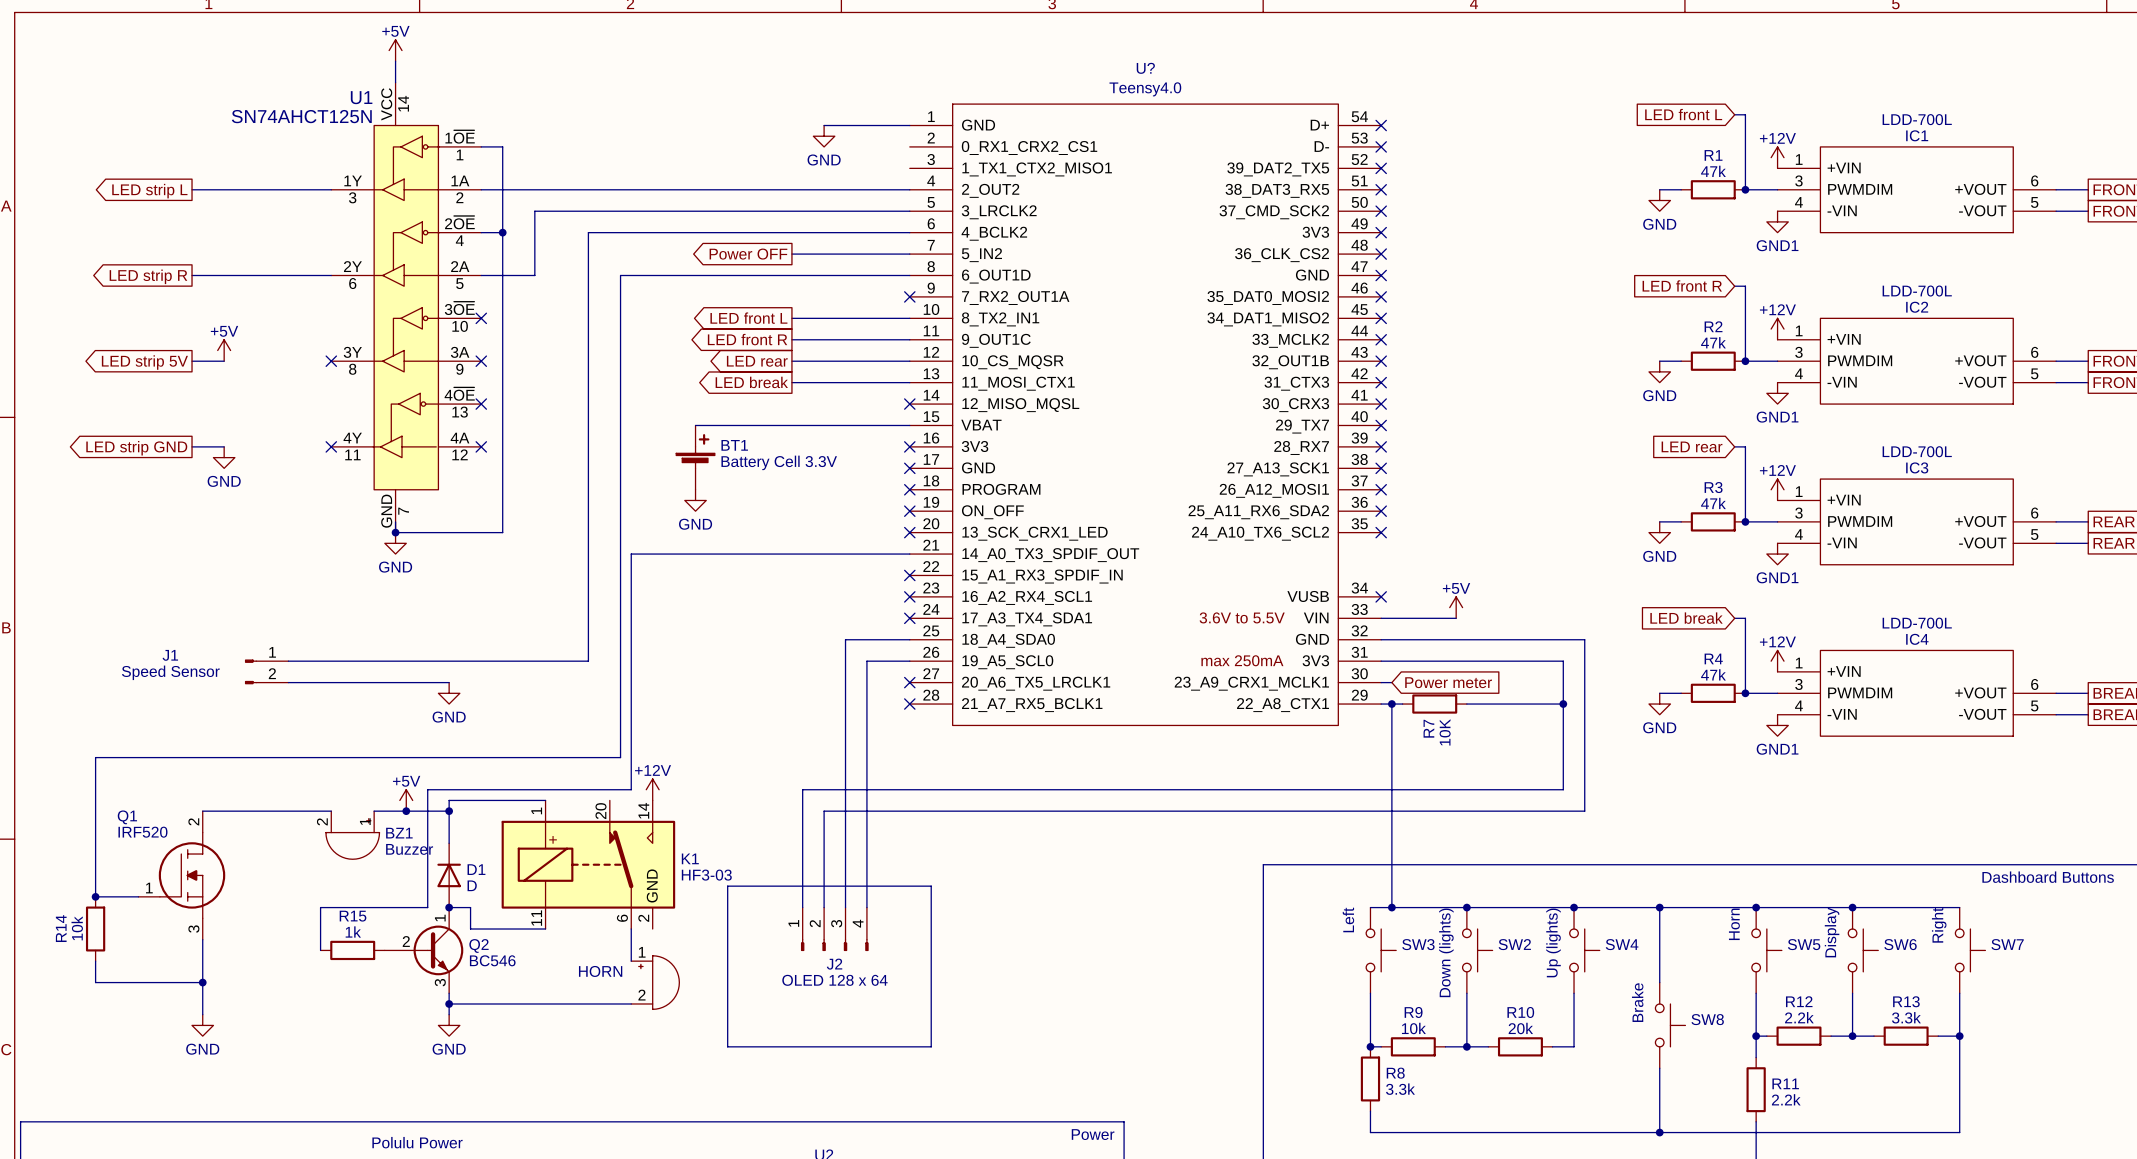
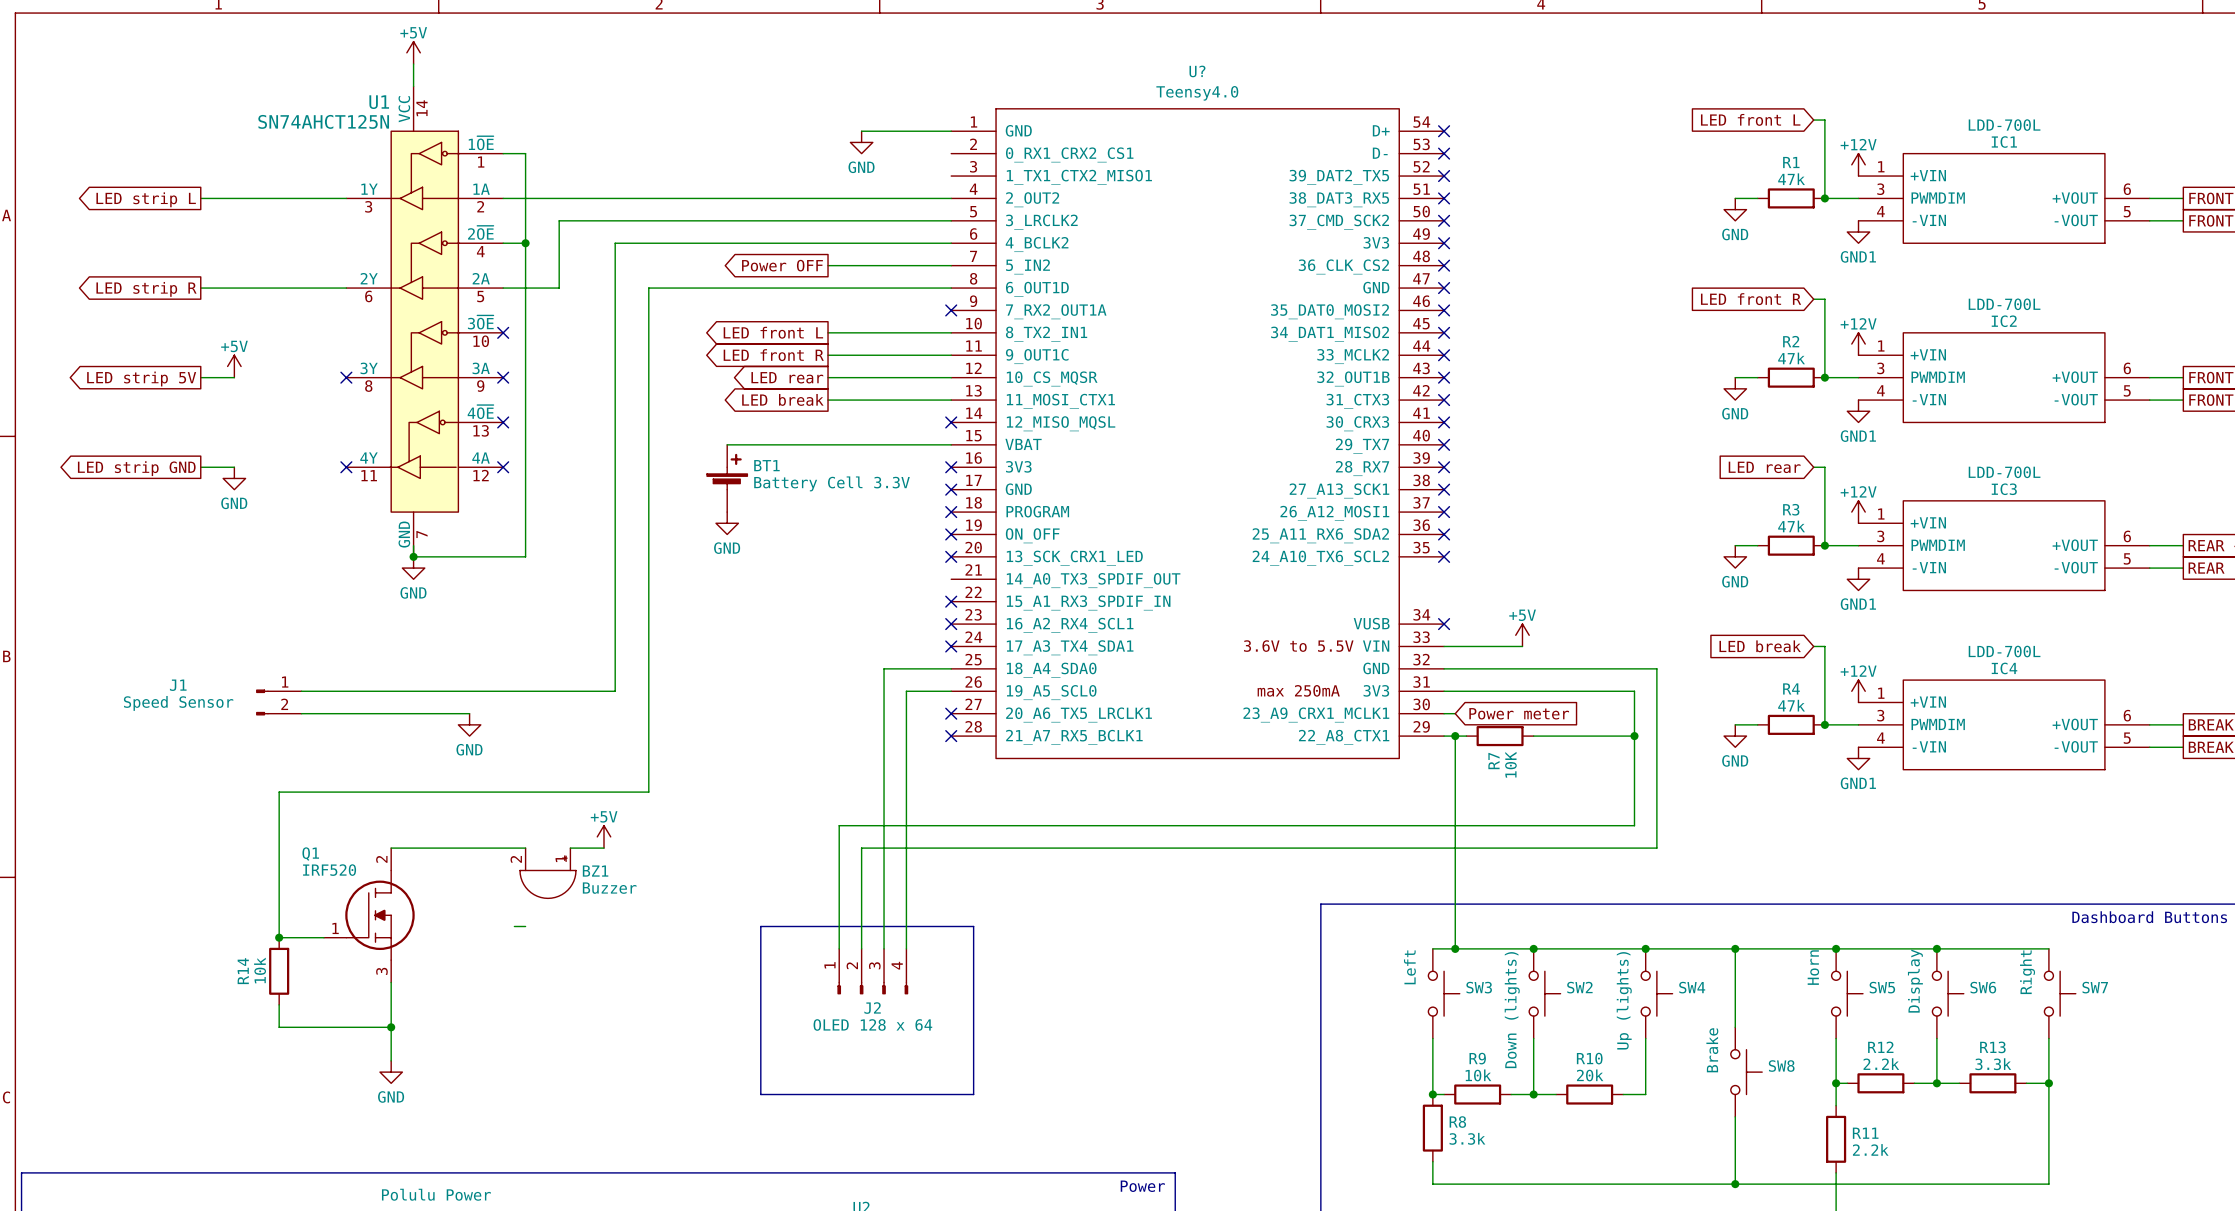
wire: (909, 554) (631, 554) (631, 789) (427, 789) (427, 907) (320, 907) (320, 950) -> none
wire: (267, 757) (95, 757) (95, 896) (138, 896) -> (279, 792) (279, 937) (323, 937)
power symbol: +12V (652, 789) -> none
power symbol position: +5V (406, 800) -> +5V (603, 836)
wire: (545, 800) (449, 800) (449, 843) -> none
wire: (202, 811) (331, 811) -> none
junction: (406, 811) -> none
wire: none -> (469, 848) (525, 848)
junction: (449, 811) -> none
wire: none -> (570, 848) (603, 848)
BZ1 position: (352, 835) -> (547, 873)
K1: HF3-03 (588, 864) -> none
Q1 position: (181, 875) -> (369, 915)
D1: D (449, 875) -> none
wire: none -> (514, 926) (525, 926)
junction: (95, 896) -> none
junction: none -> (279, 937)
wire: (449, 907) (470, 907) (470, 929) (545, 929) -> none
junction: (449, 907) -> none
R14 position: (95, 929) -> (279, 971)
wire: (631, 929) (631, 961) -> none
wire: (202, 939) (202, 1014) -> (391, 982) (391, 1060)
R15: 1k (352, 950) -> none
Q2: BC546 (424, 950) -> none
wire: (95, 961) (95, 982) (202, 982) -> (279, 1004) (279, 1027) (391, 1027)
junction: (202, 982) -> none
junction: none -> (391, 1027)
HORN: (655, 982) -> none
wire: (449, 993) (449, 1014) -> none
wire: (449, 1003) (631, 1003) -> none
junction: (449, 1003) -> none
power symbol: GND (202, 1025) -> none
power symbol position: GND (449, 1025) -> GND (391, 1072)

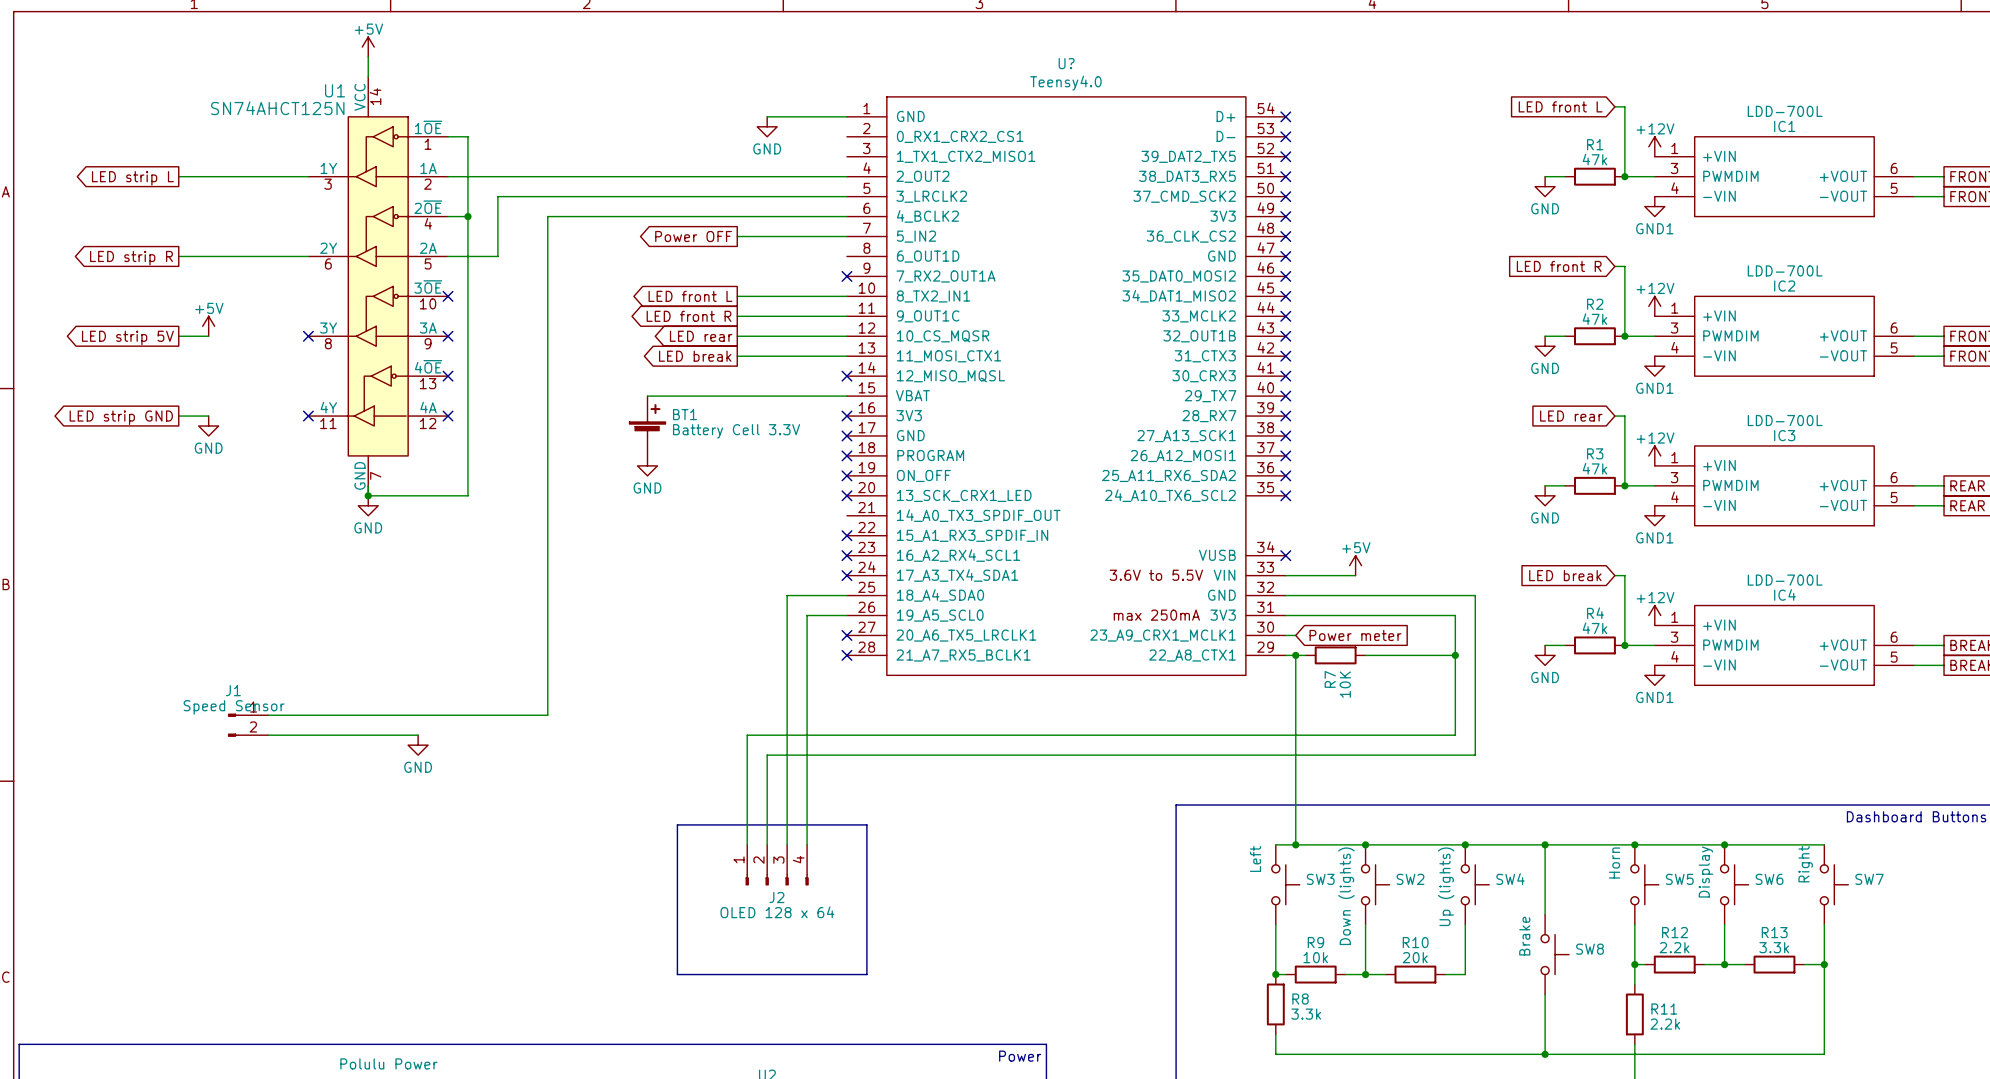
wire: (951, 288) (648, 288) (648, 792) (279, 792) (279, 937) (323, 937) -> none
J1 name position: J1 (178, 685) -> J1 (233, 690)
wire: (301, 691) (615, 691) -> (268, 715) (547, 715) (547, 615)
J1 position: (278, 702) -> (248, 725)
J1 value position: Speed Sensor (178, 703) -> Speed Sensor (234, 707)
wire: (301, 713) (469, 713) -> (268, 735) (418, 735)
power symbol position: GND (469, 724) -> GND (418, 745)
power symbol: +5V (603, 836) -> none
wire: (391, 848) (525, 848) -> none
wire: (570, 848) (603, 848) -> none
BZ1: Buzzer (547, 873) -> none
Q1: IRF520 (369, 915) -> none
wire: (514, 926) (525, 926) -> none
junction: (279, 937) -> none
R14: 10k (279, 971) -> none
wire: (391, 982) (391, 1060) -> none
wire: (279, 1004) (279, 1027) (391, 1027) -> none
junction: (391, 1027) -> none
power symbol: GND (391, 1072) -> none

